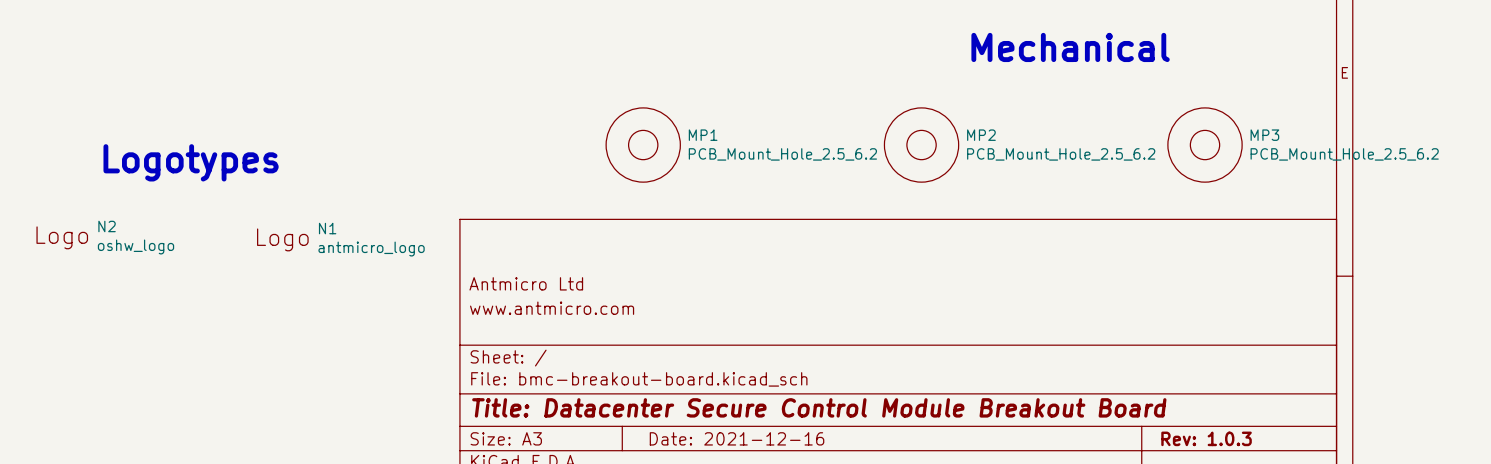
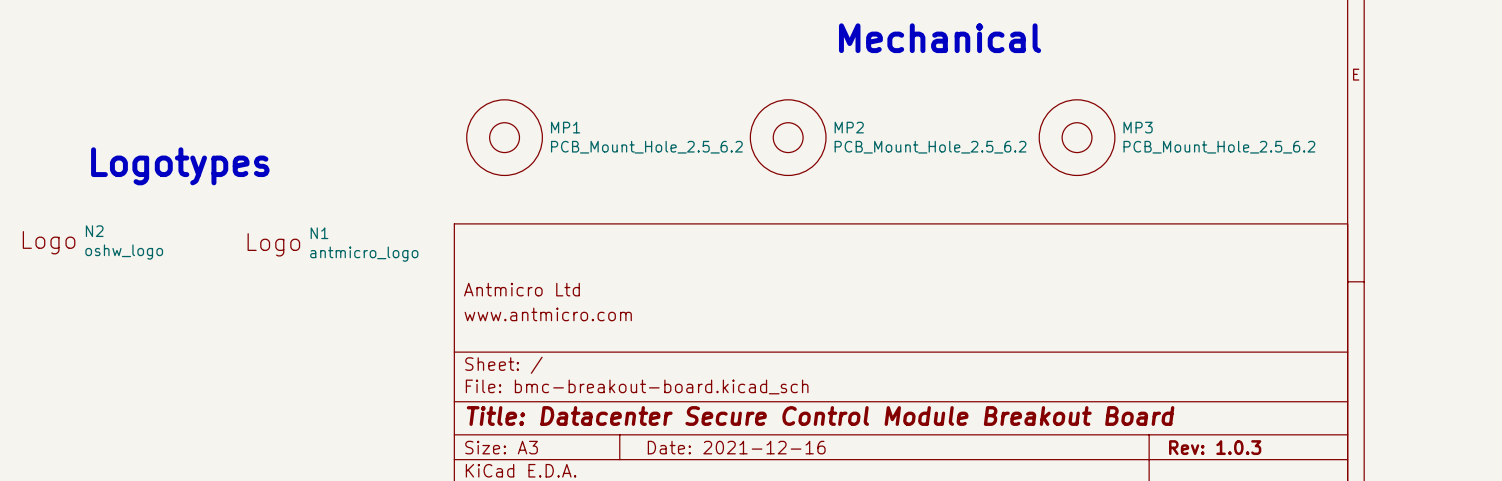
text position: Mechanical (1070, 47) -> Mechanical (940, 38)
MP1 position: (643, 145) -> (504, 137)
MP2 position: (921, 145) -> (788, 137)
MP3 position: (1205, 145) -> (1077, 137)

